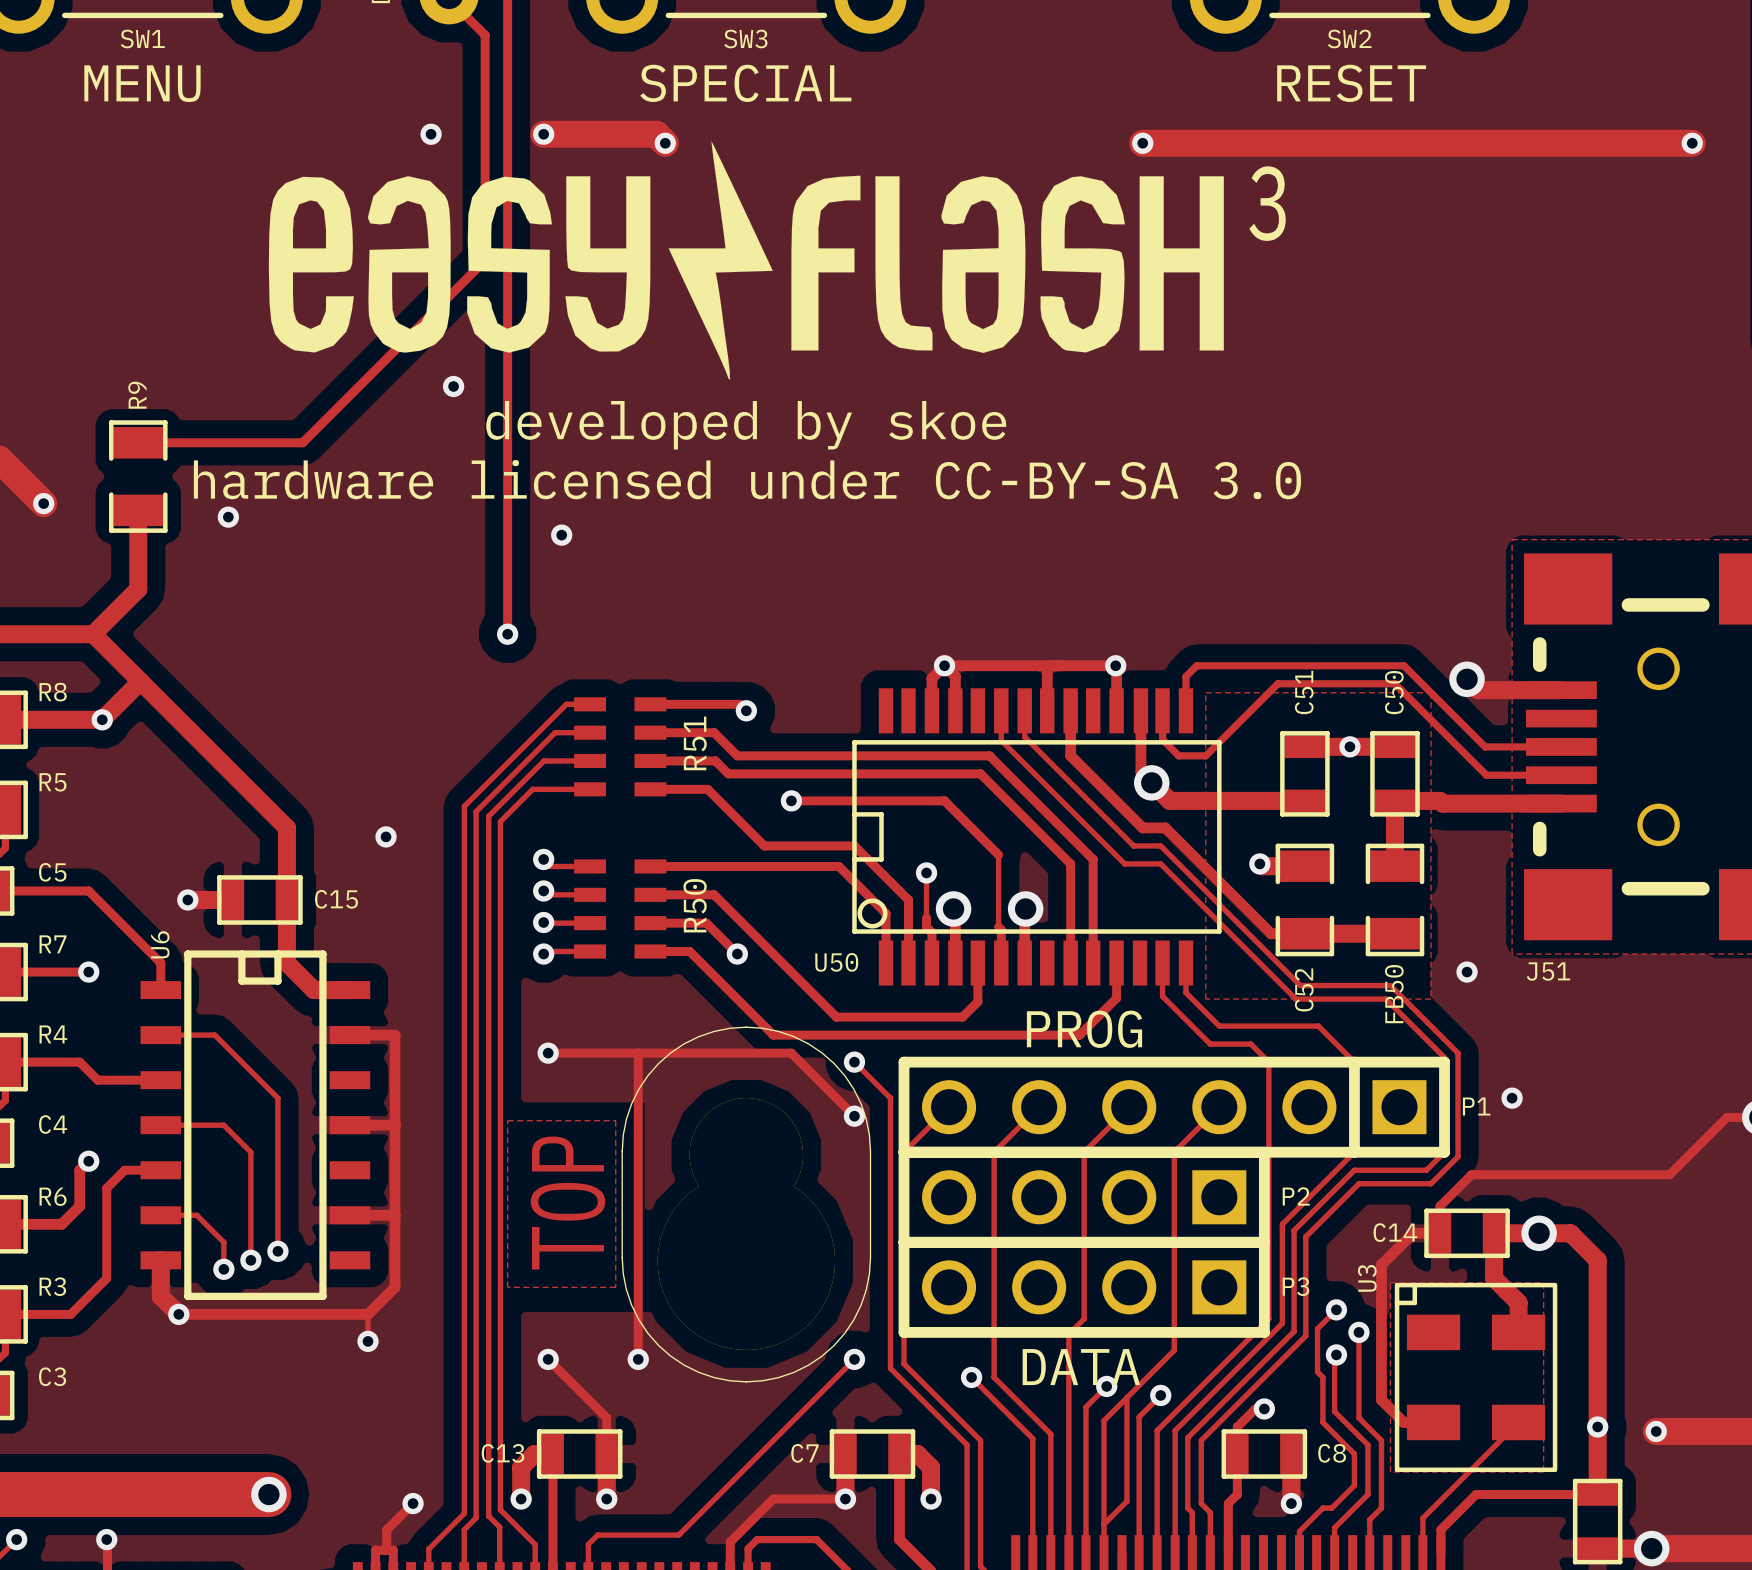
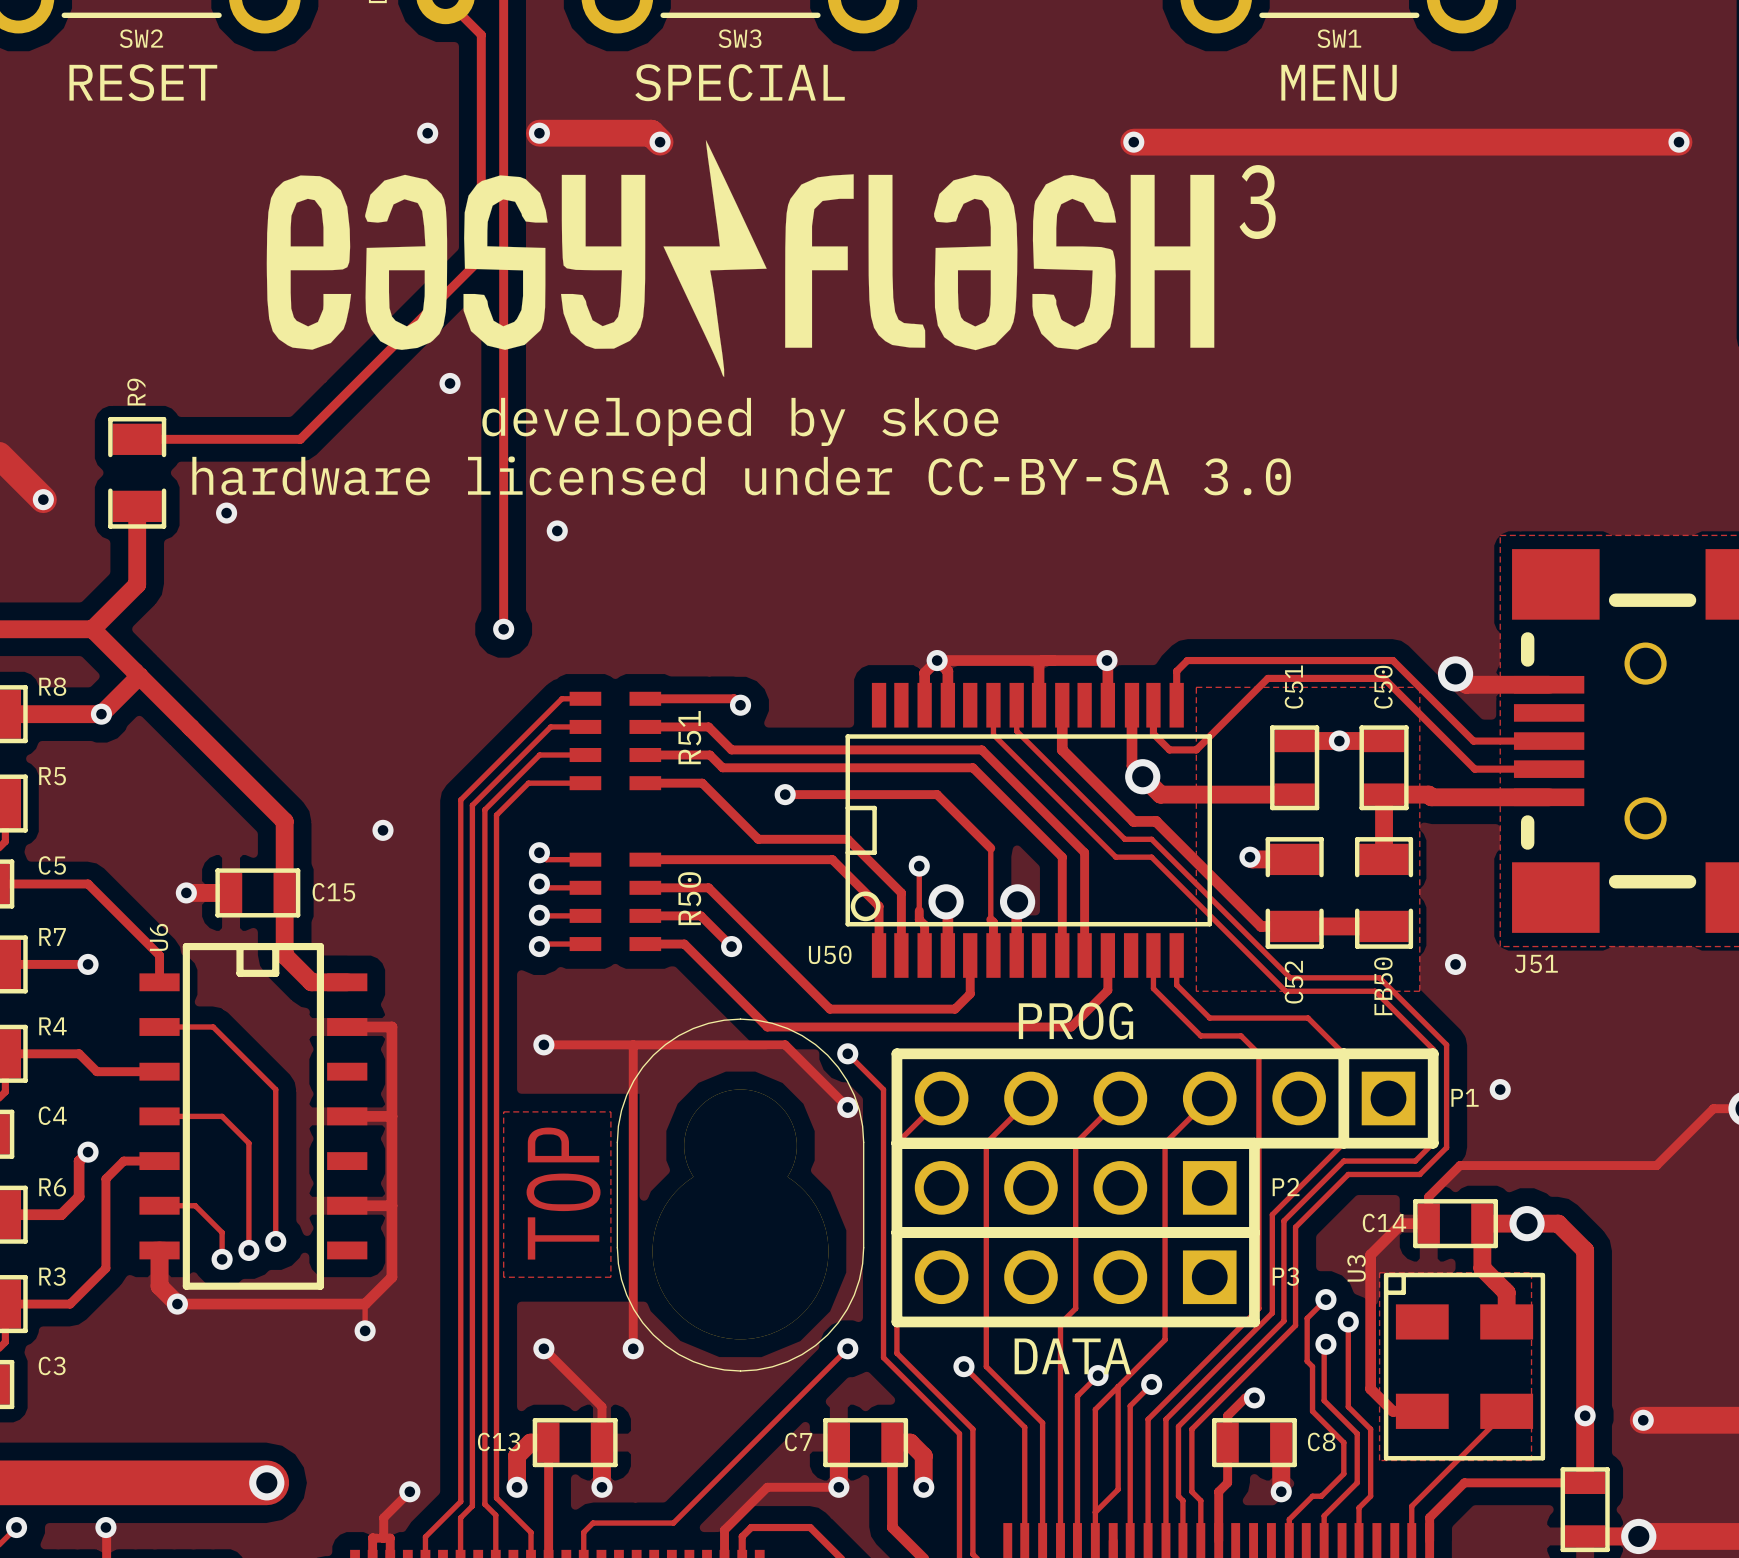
SW1 name: SW1 (142, 38) -> SW2 (141, 38)
SW2 name: SW2 (1349, 38) -> SW1 (1339, 38)
SW1 value: MENU (142, 83) -> RESET (143, 82)
SW2 value: RESET (1351, 83) -> MENU (1339, 83)

